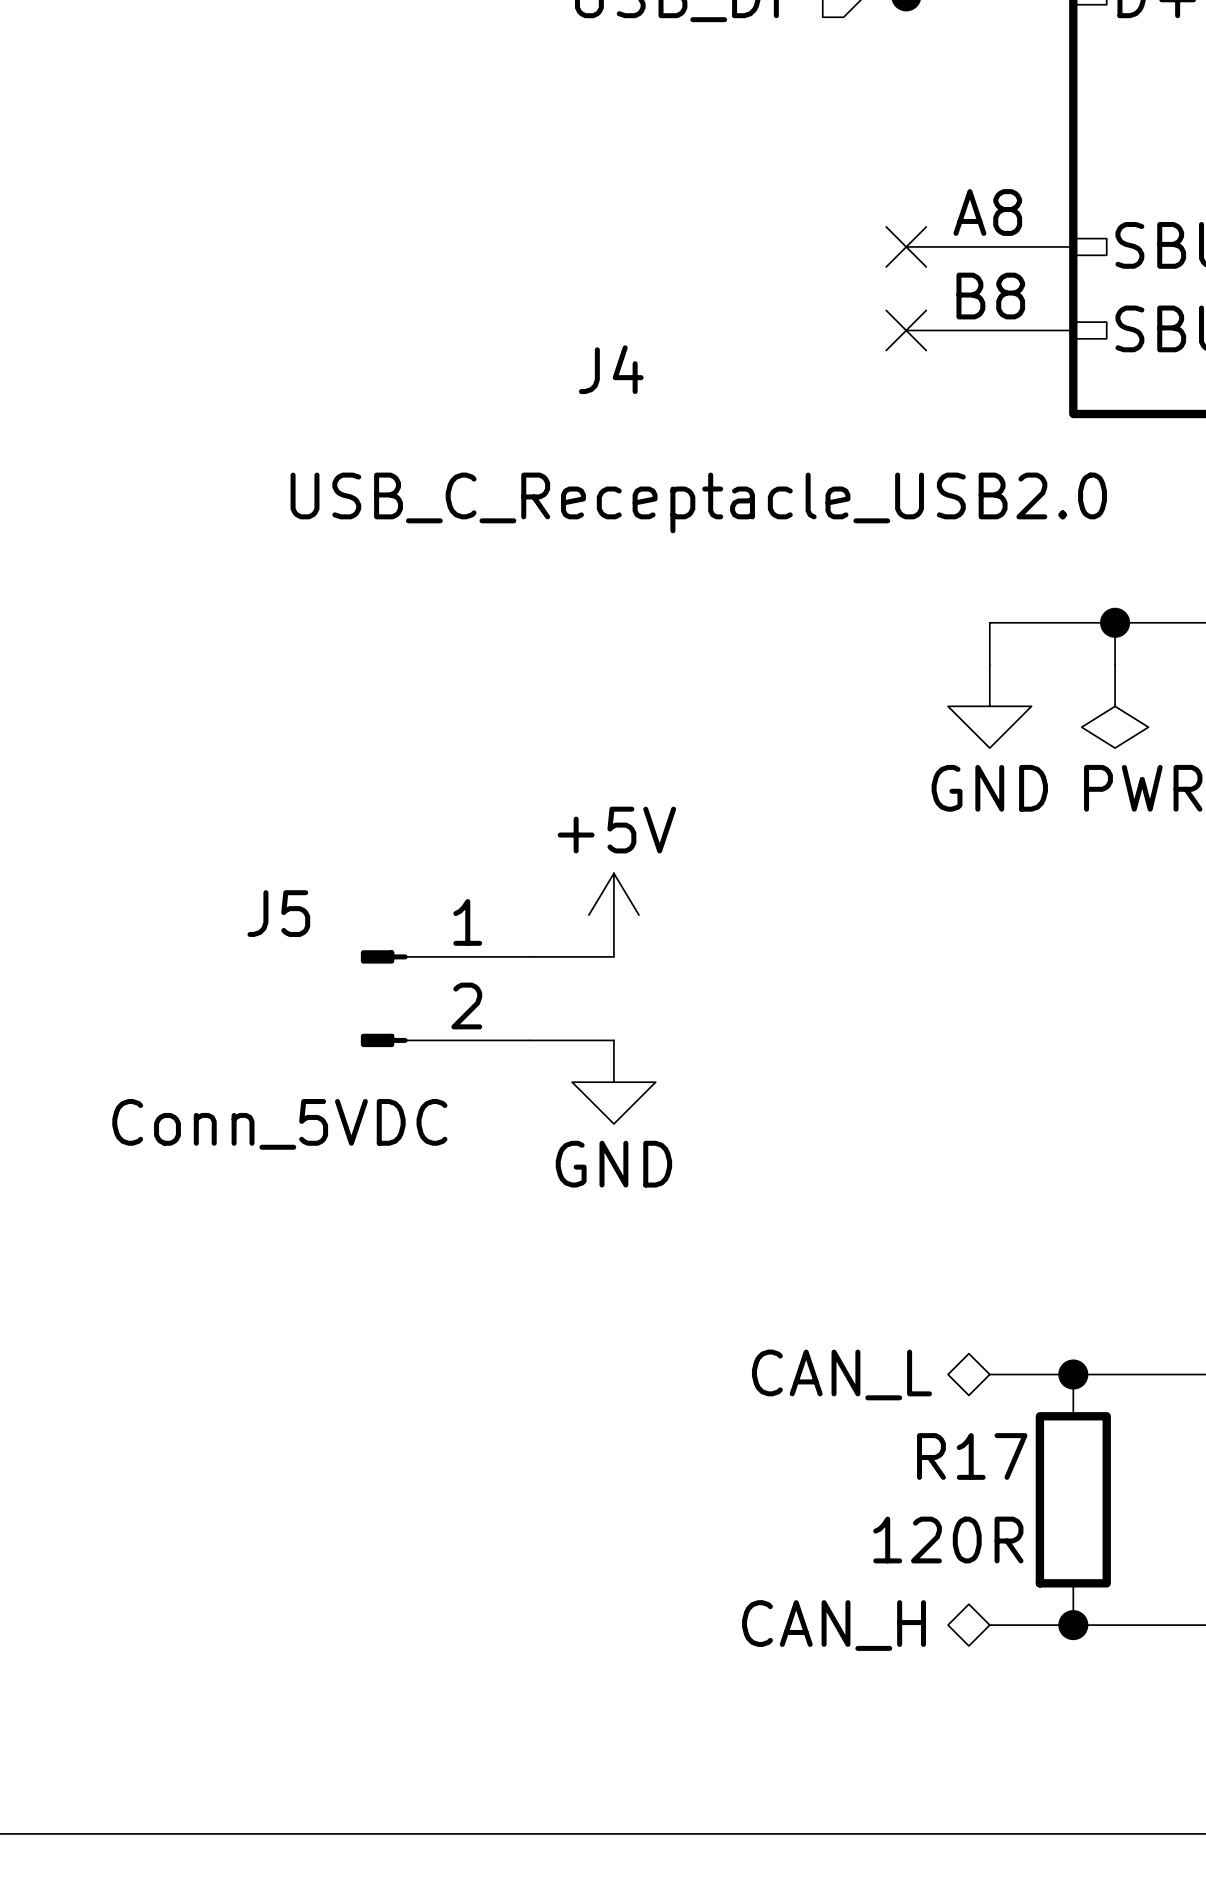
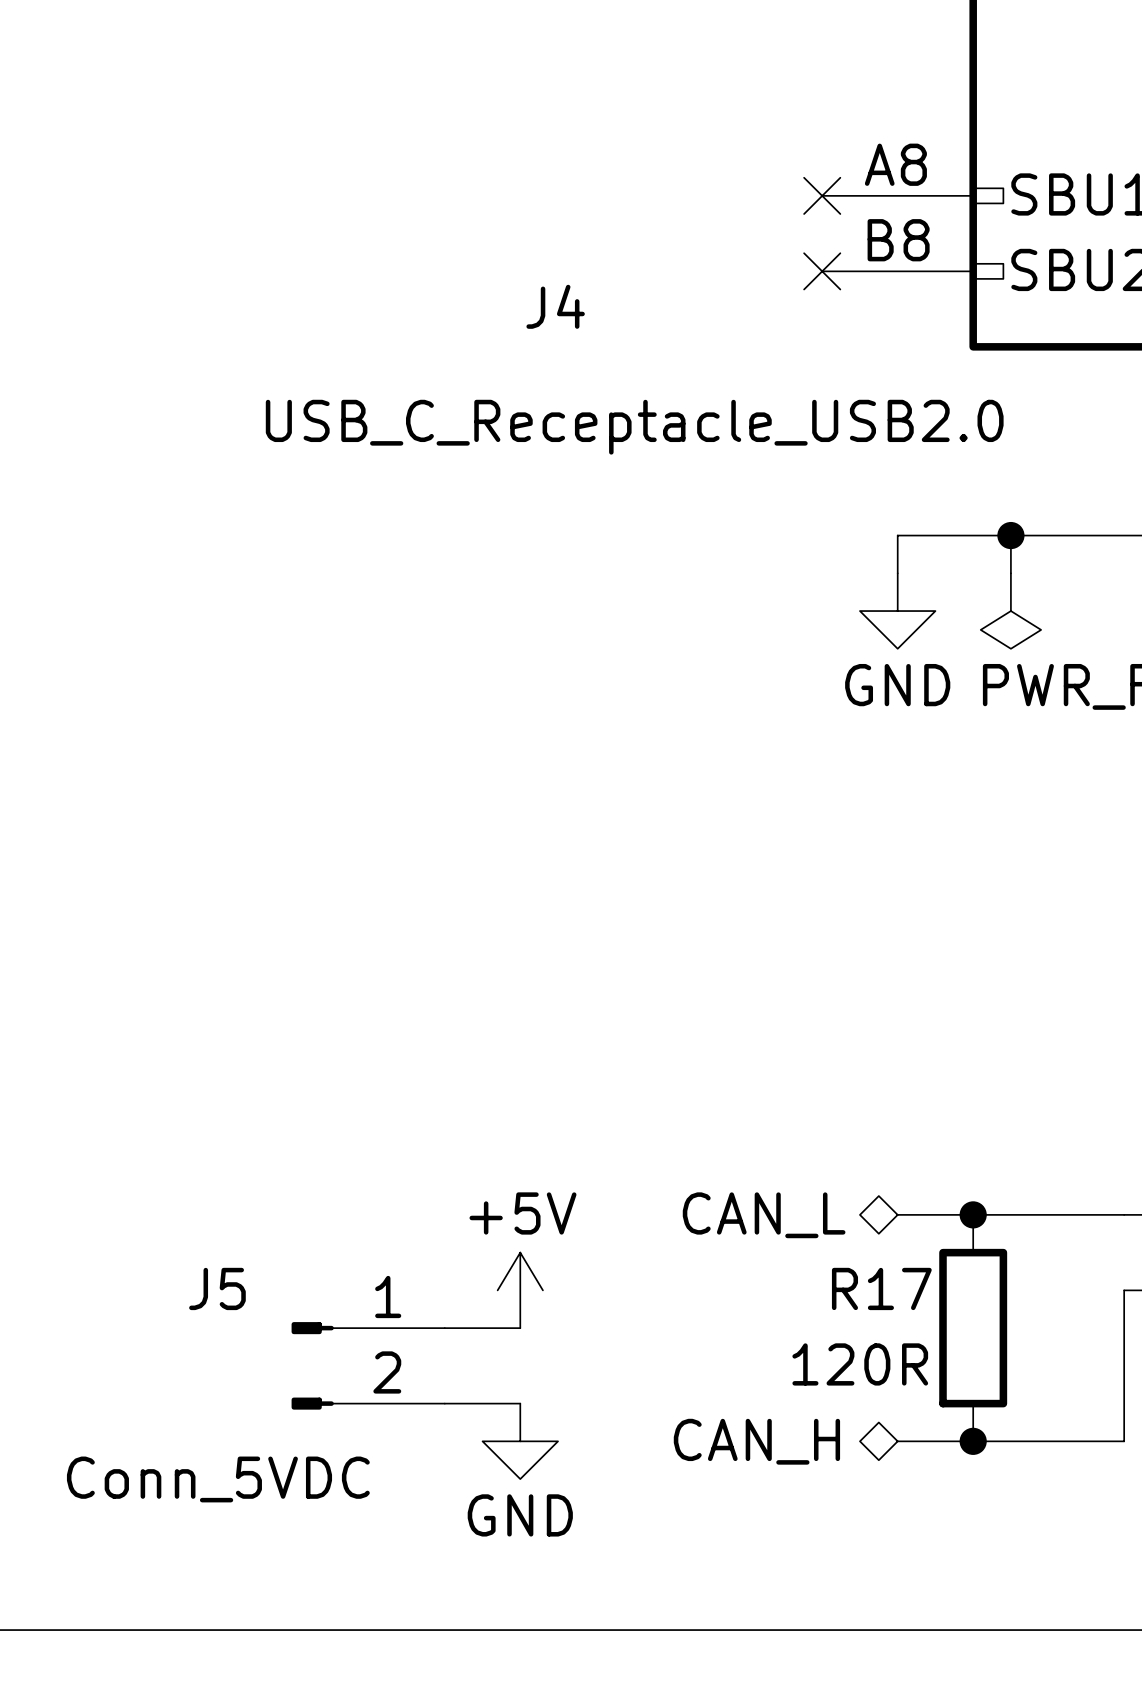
power symbol position: +5V (613, 915) -> +5V (520, 1290)
wire: (530, 956) (613, 956) -> (444, 1403) (520, 1403)
J5 position: (445, 998) -> (368, 1365)
wire: (530, 1040) (613, 1040) -> (444, 1328) (520, 1328)
power symbol position: GND (613, 1082) -> GND (520, 1441)

